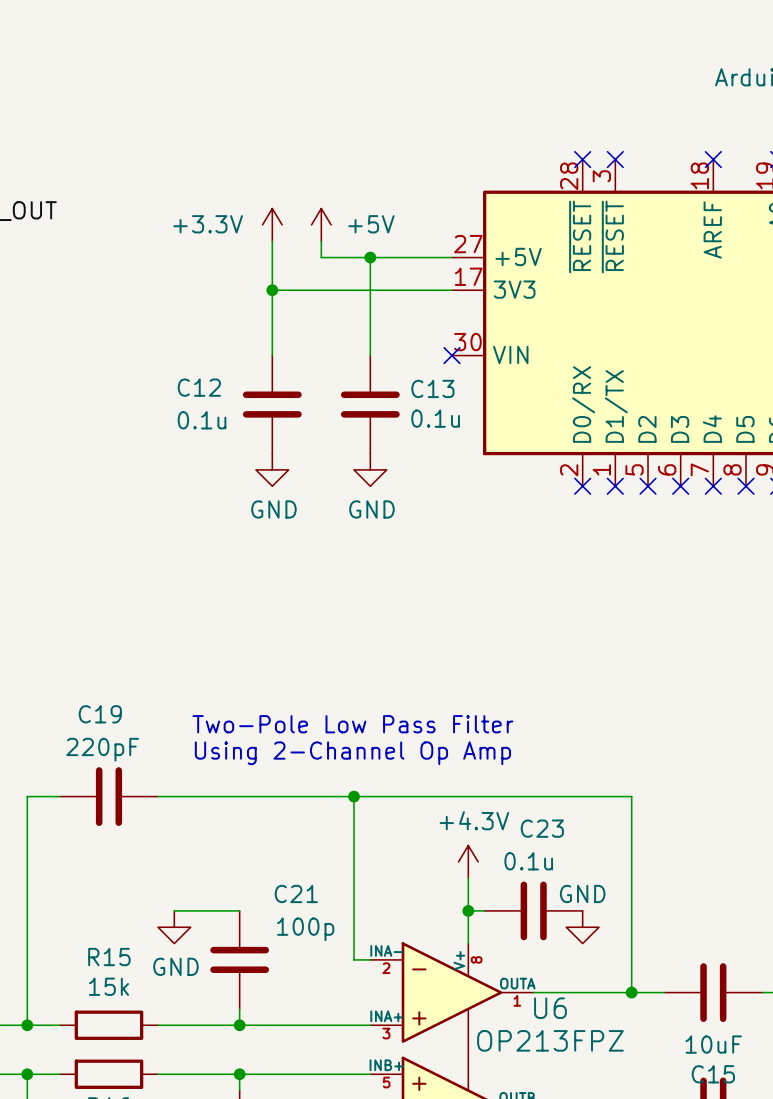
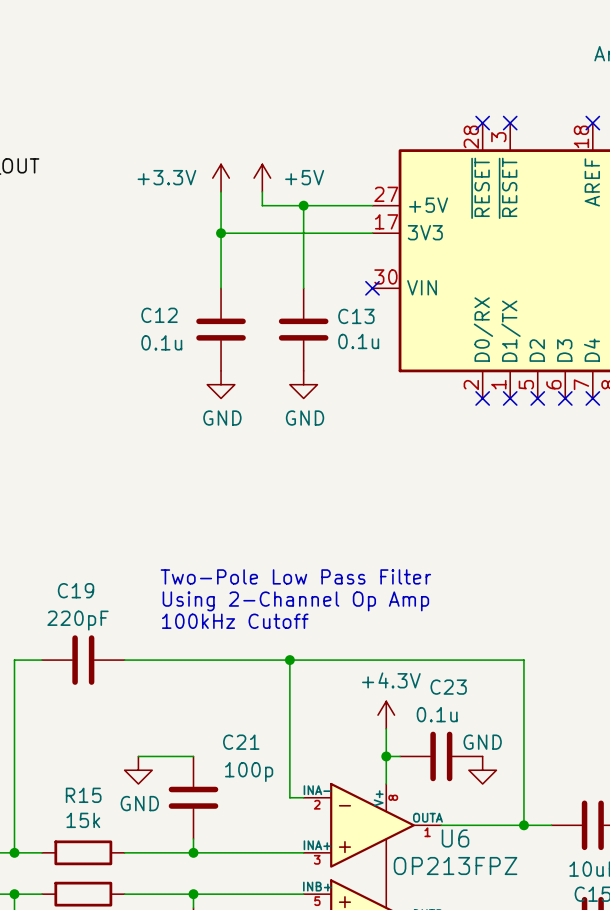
text: none -> Two-Pole Low Pass Filter (295, 576)
text: Two-Pole Low Pass Filter (352, 724) -> Using 2-Channel Op Amp (295, 601)
text: Using 2-Channel Op Amp (352, 753) -> 100kHz Cutoff (235, 621)

